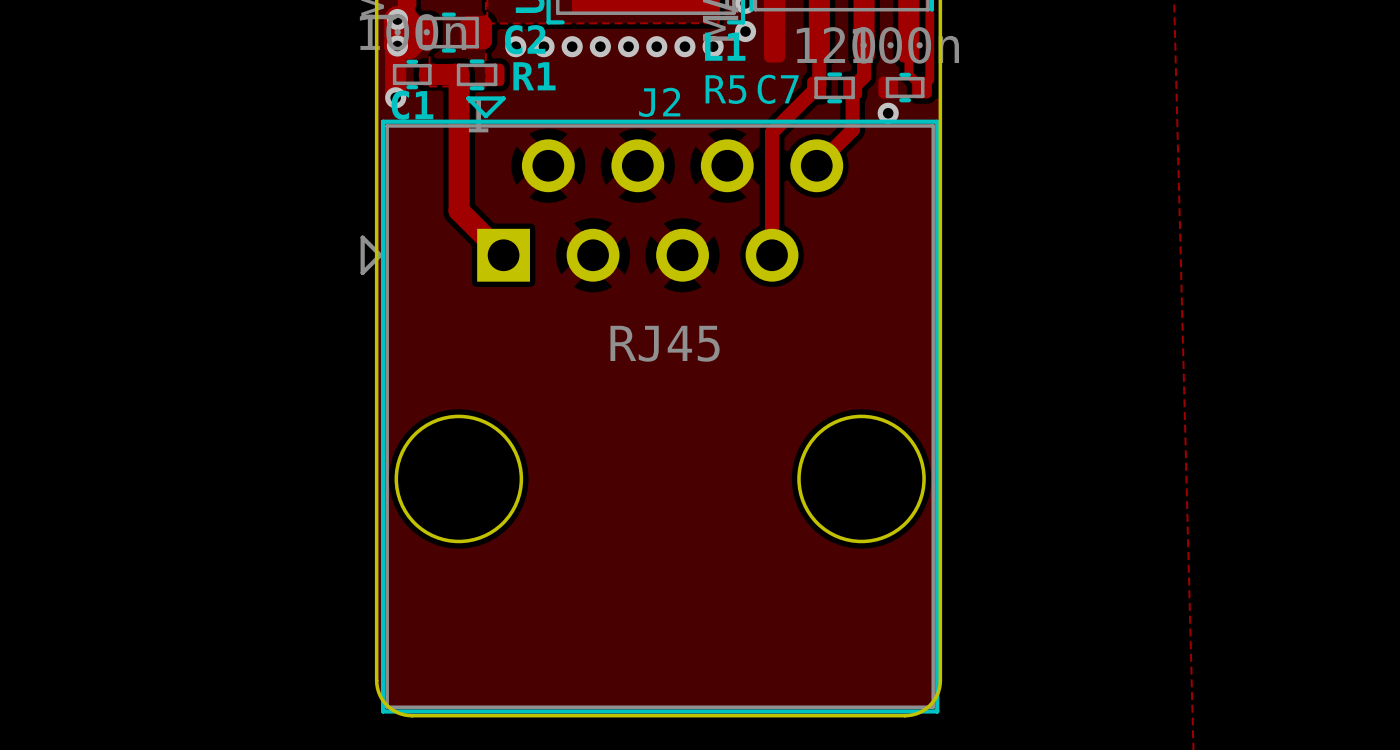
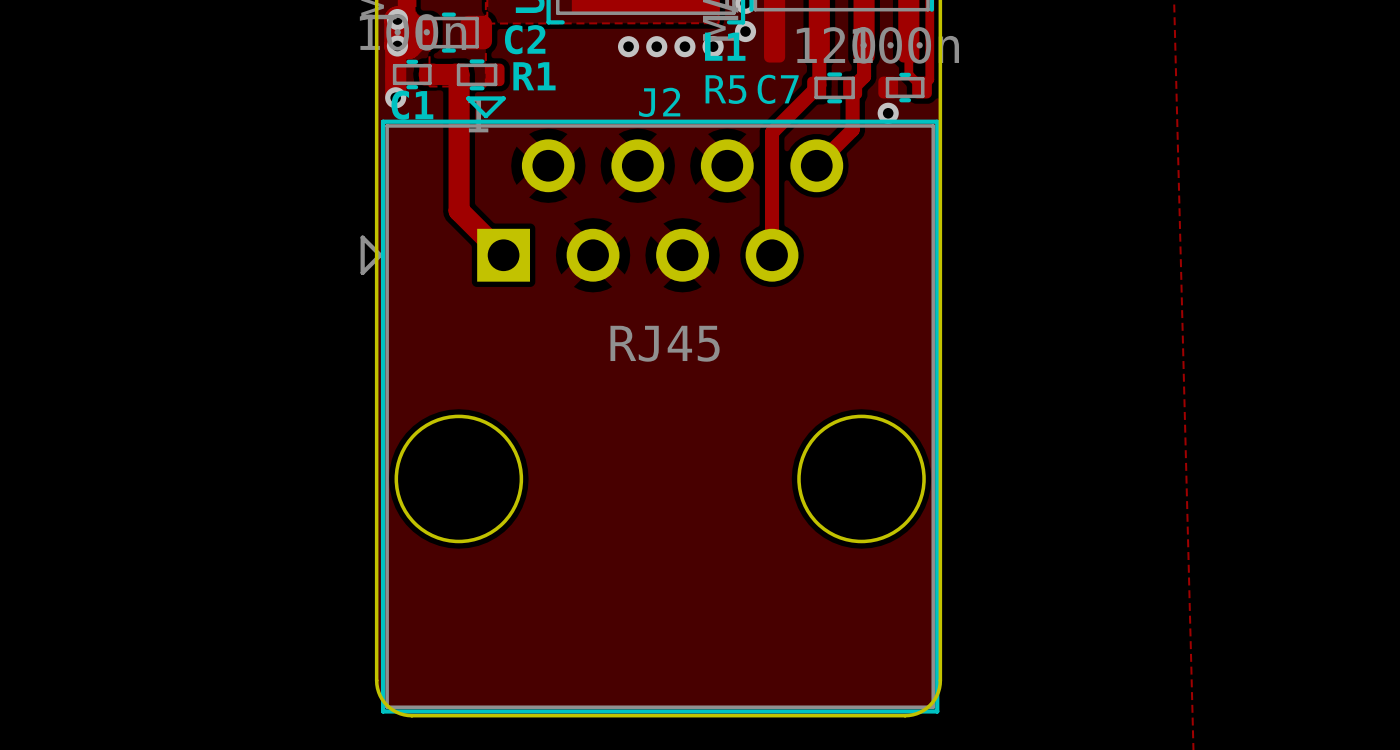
via: (515, 46) -> none
via: (544, 46) -> none
via: (572, 46) -> none
via: (600, 46) -> none

